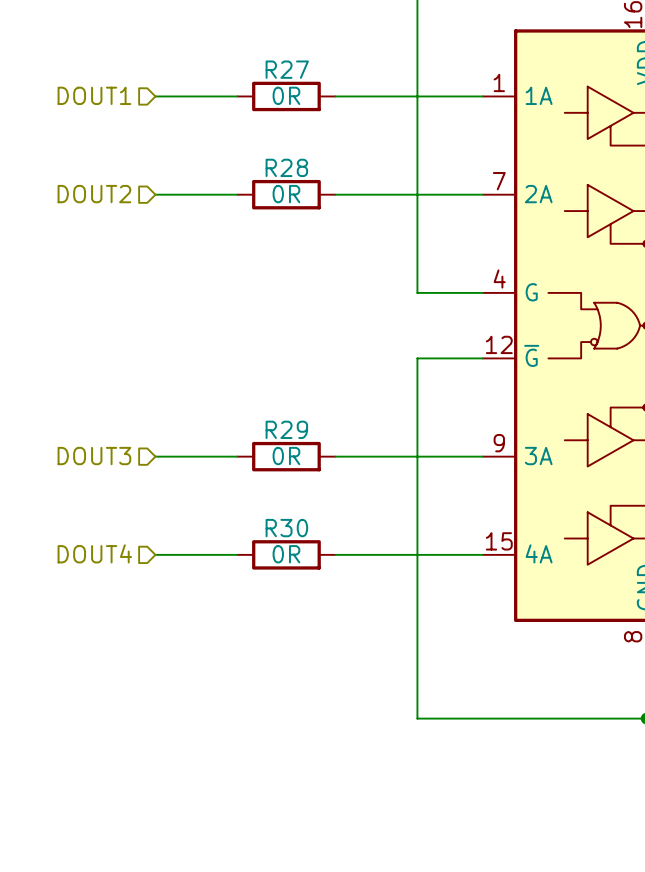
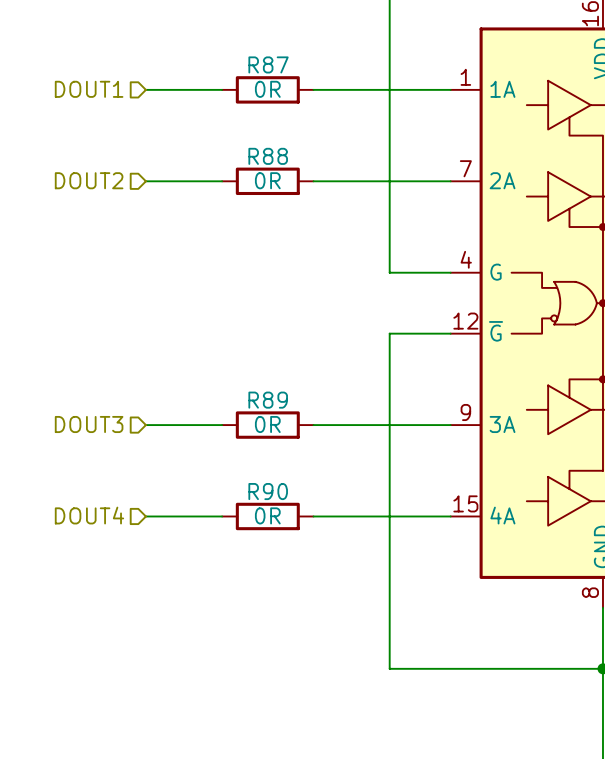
R27 name: R27 (287, 69) -> R87 (268, 64)
R28 name: R28 (286, 167) -> R88 (268, 156)
R29 name: R29 (286, 429) -> R89 (268, 400)
R30 name: R30 (286, 528) -> R90 (268, 491)

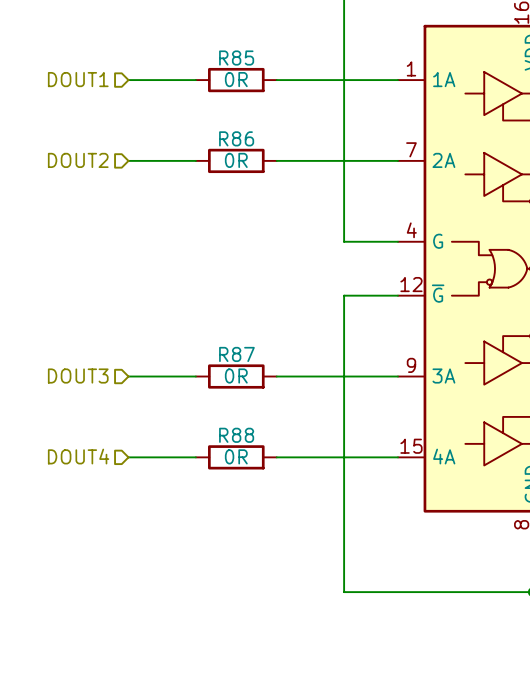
R87 name: R87 (268, 64) -> R85 (236, 58)
R88 name: R88 (268, 156) -> R86 (236, 138)
R89 name: R89 (268, 400) -> R87 (236, 354)
R90 name: R90 (268, 491) -> R88 (236, 435)

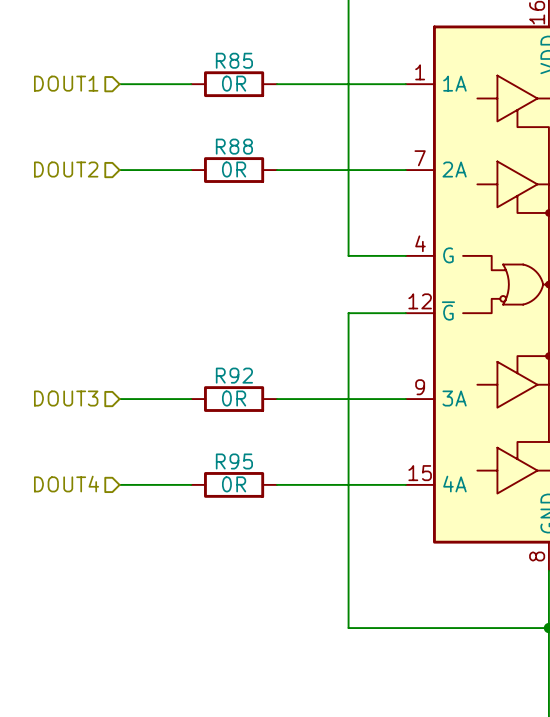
R86 name: R86 (236, 138) -> R88 (234, 146)
R87 name: R87 (236, 354) -> R92 (234, 375)
R88 name: R88 (236, 435) -> R95 (234, 461)

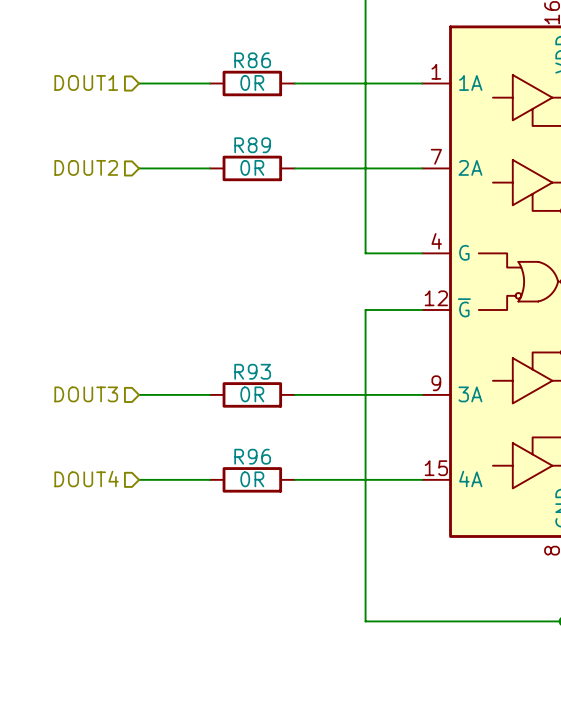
R85 name: R85 (234, 60) -> R86 (252, 60)
R88 name: R88 (234, 146) -> R89 (252, 145)
R92 name: R92 (234, 375) -> R93 (252, 371)
R95 name: R95 (234, 461) -> R96 (252, 456)

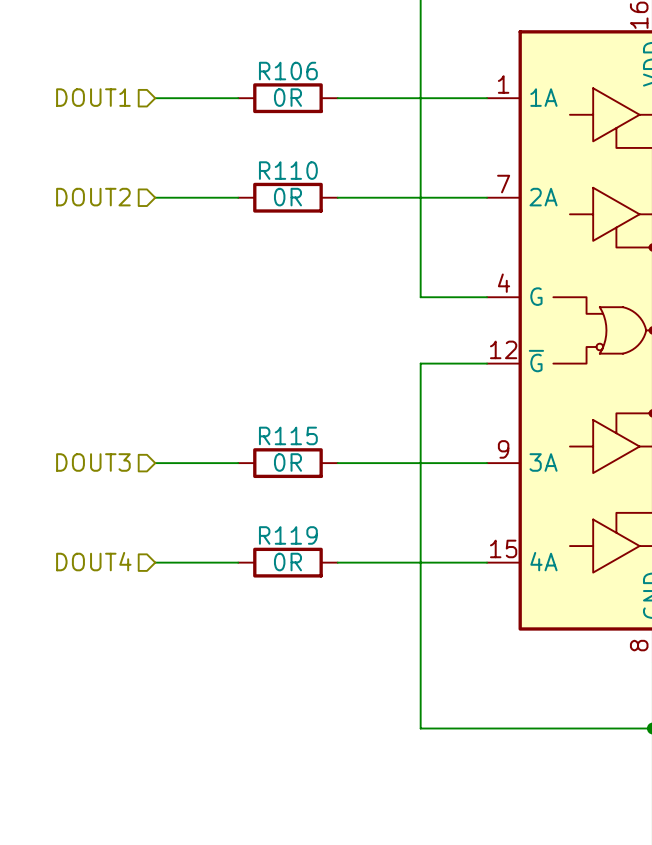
R86 name: R86 (252, 60) -> R106 (288, 71)
R89 name: R89 (252, 145) -> R110 (288, 170)
R93 name: R93 (252, 371) -> R115 (288, 435)
R96 name: R96 (252, 456) -> R119 (288, 535)

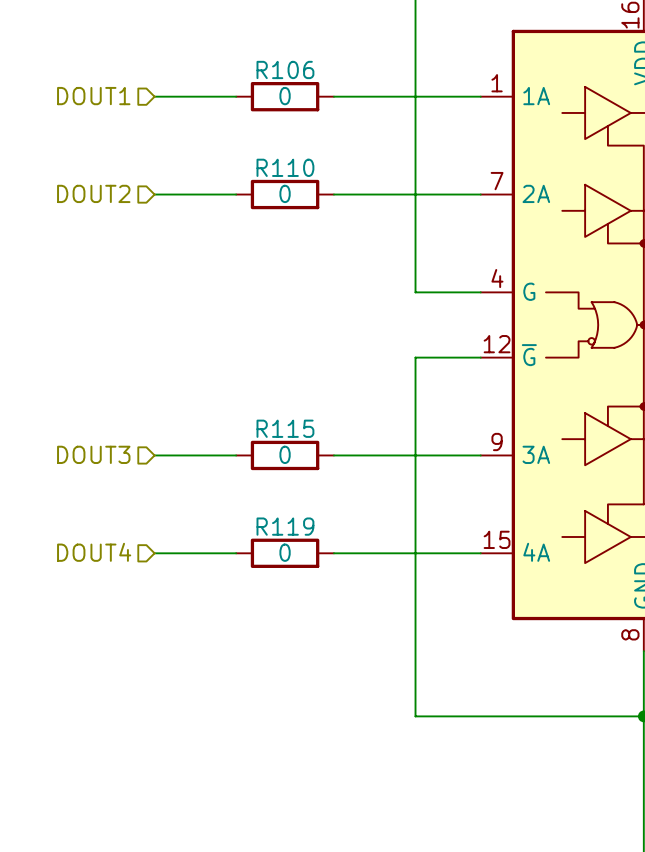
R106 value: 0R (287, 97) -> 0 (285, 96)
R110 value: 0R (287, 197) -> 0 (285, 193)
R115 value: 0R (287, 462) -> 0 (285, 454)
R119 value: 0R (287, 562) -> 0 (285, 552)

